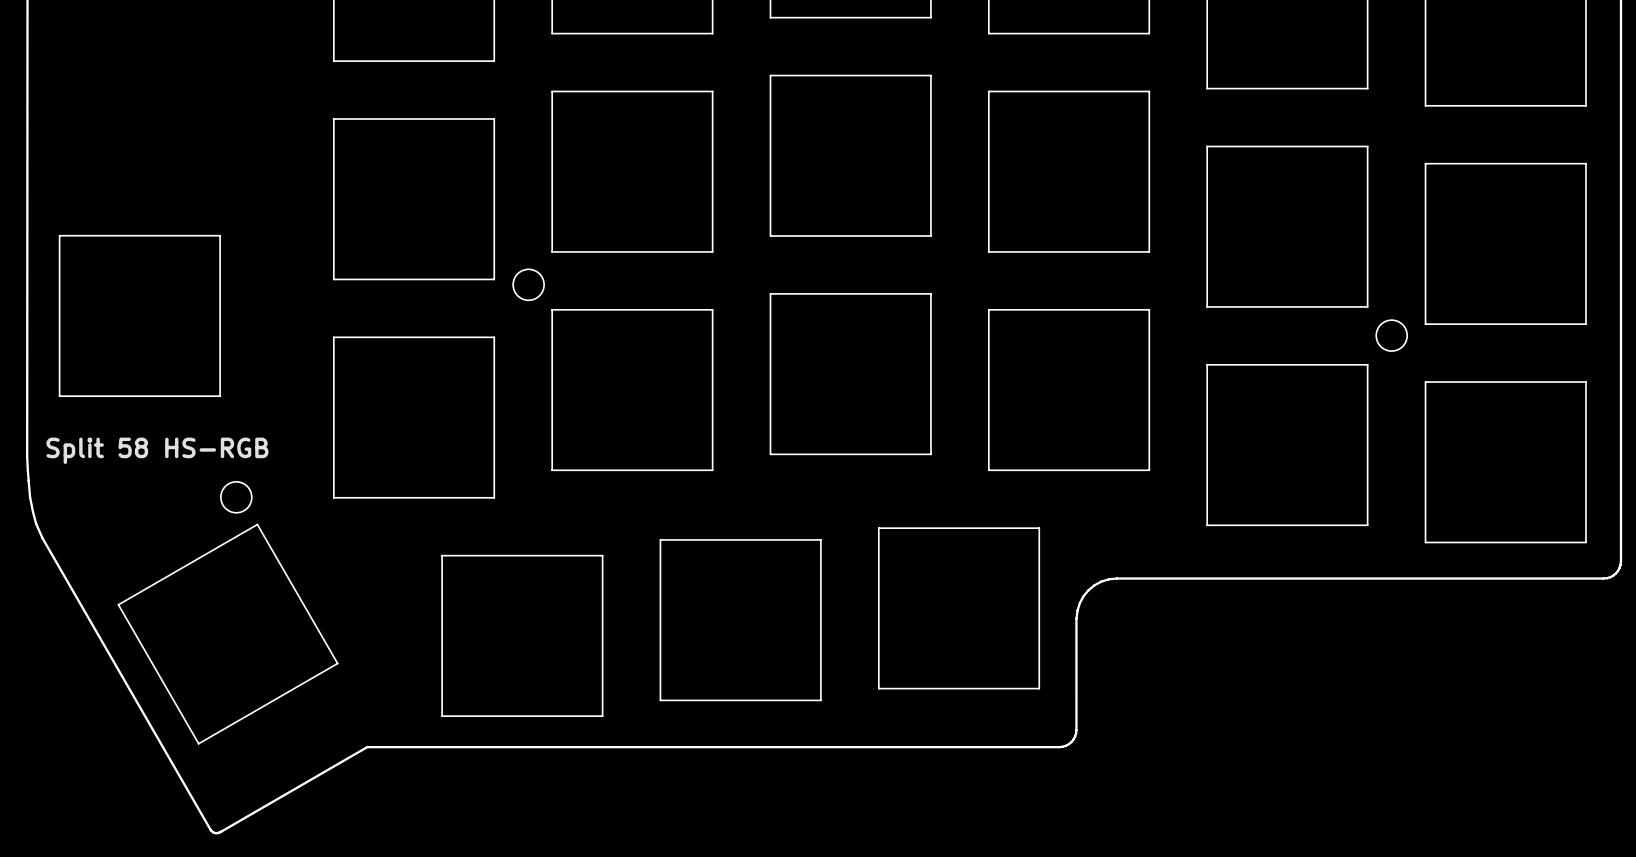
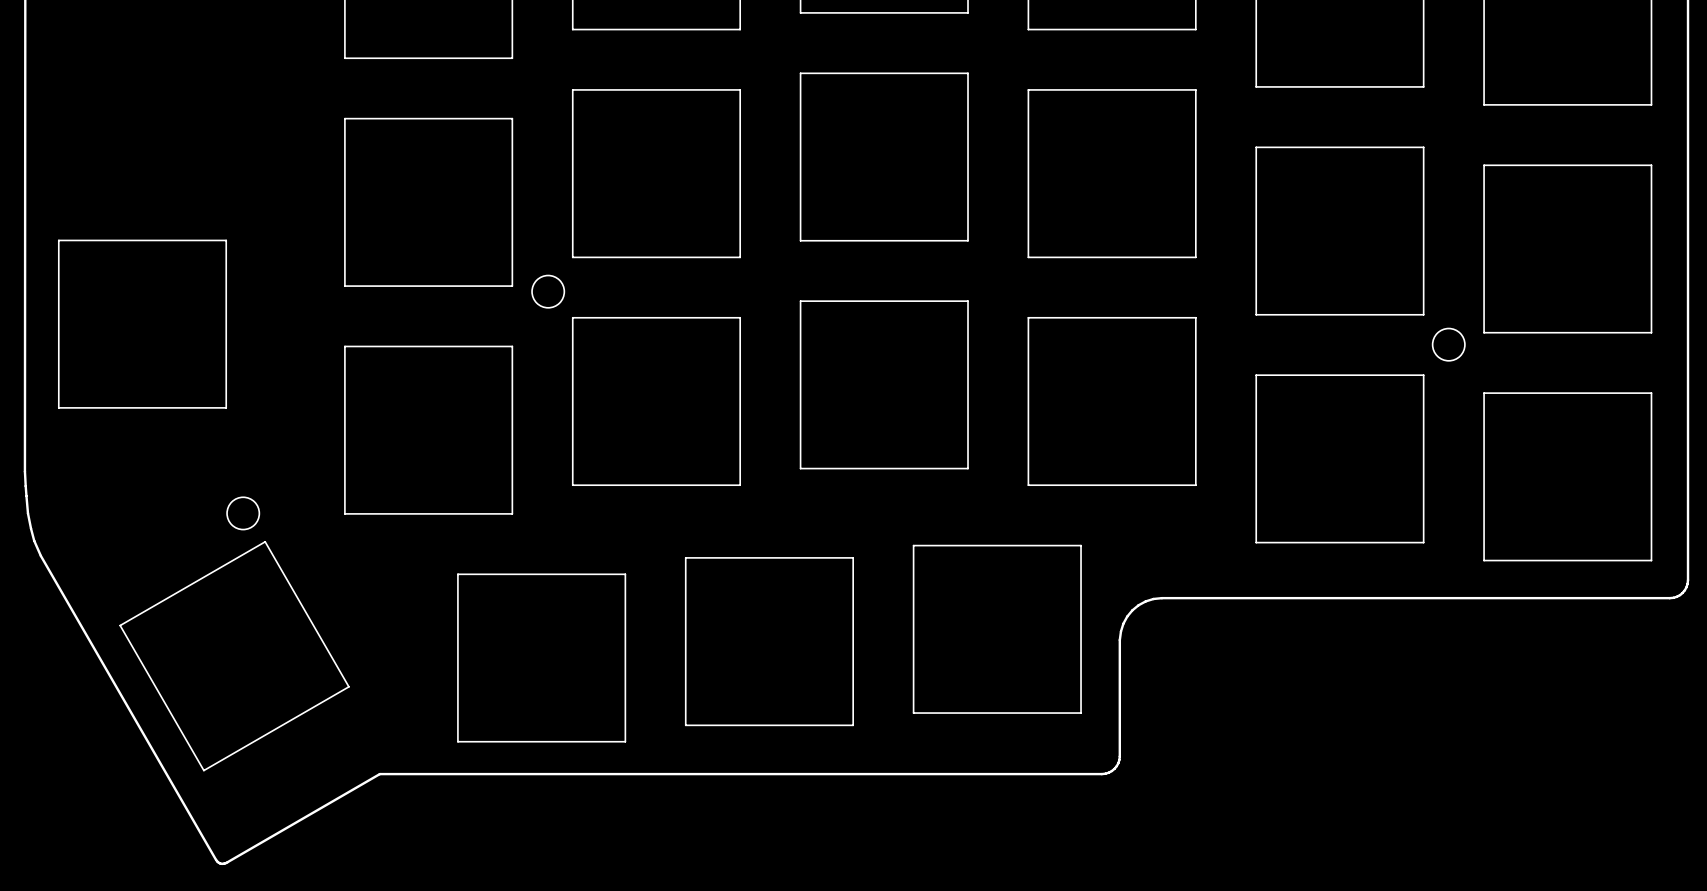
text: Split 58 HS-RGB (157, 450) -> none

